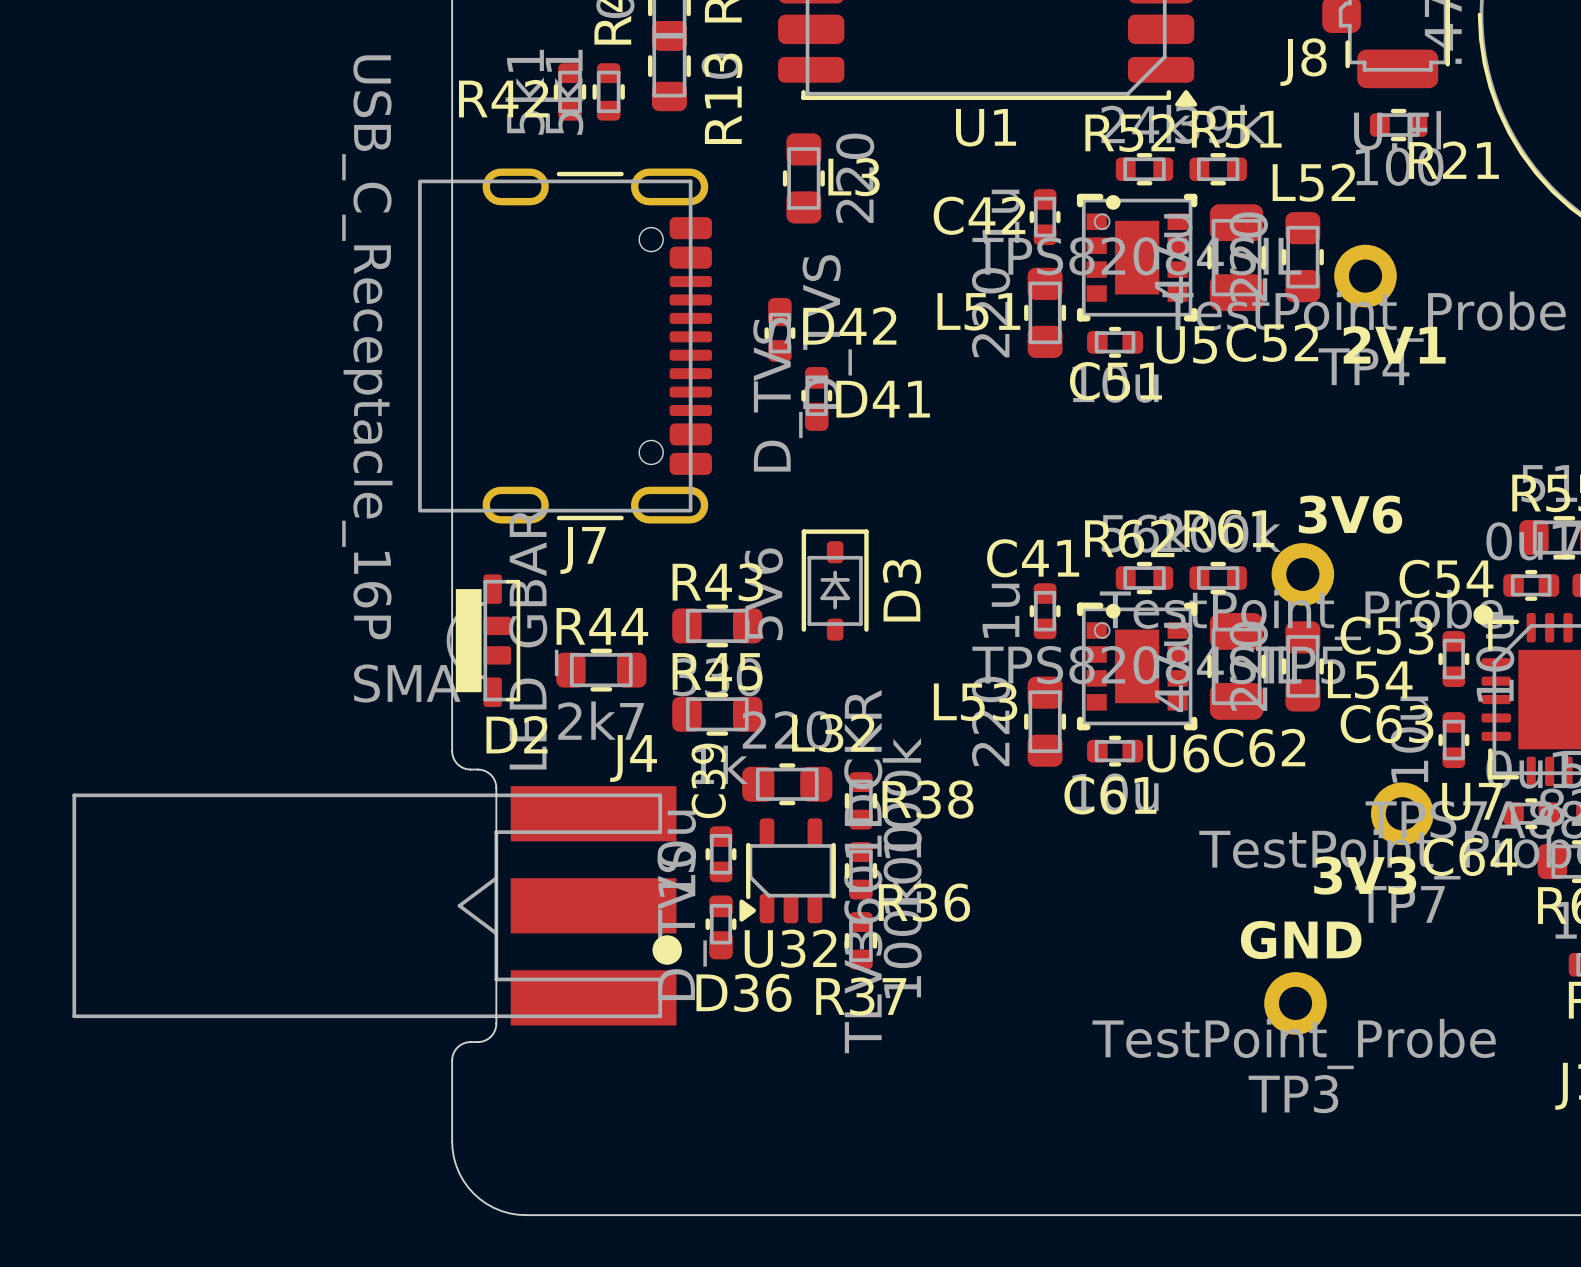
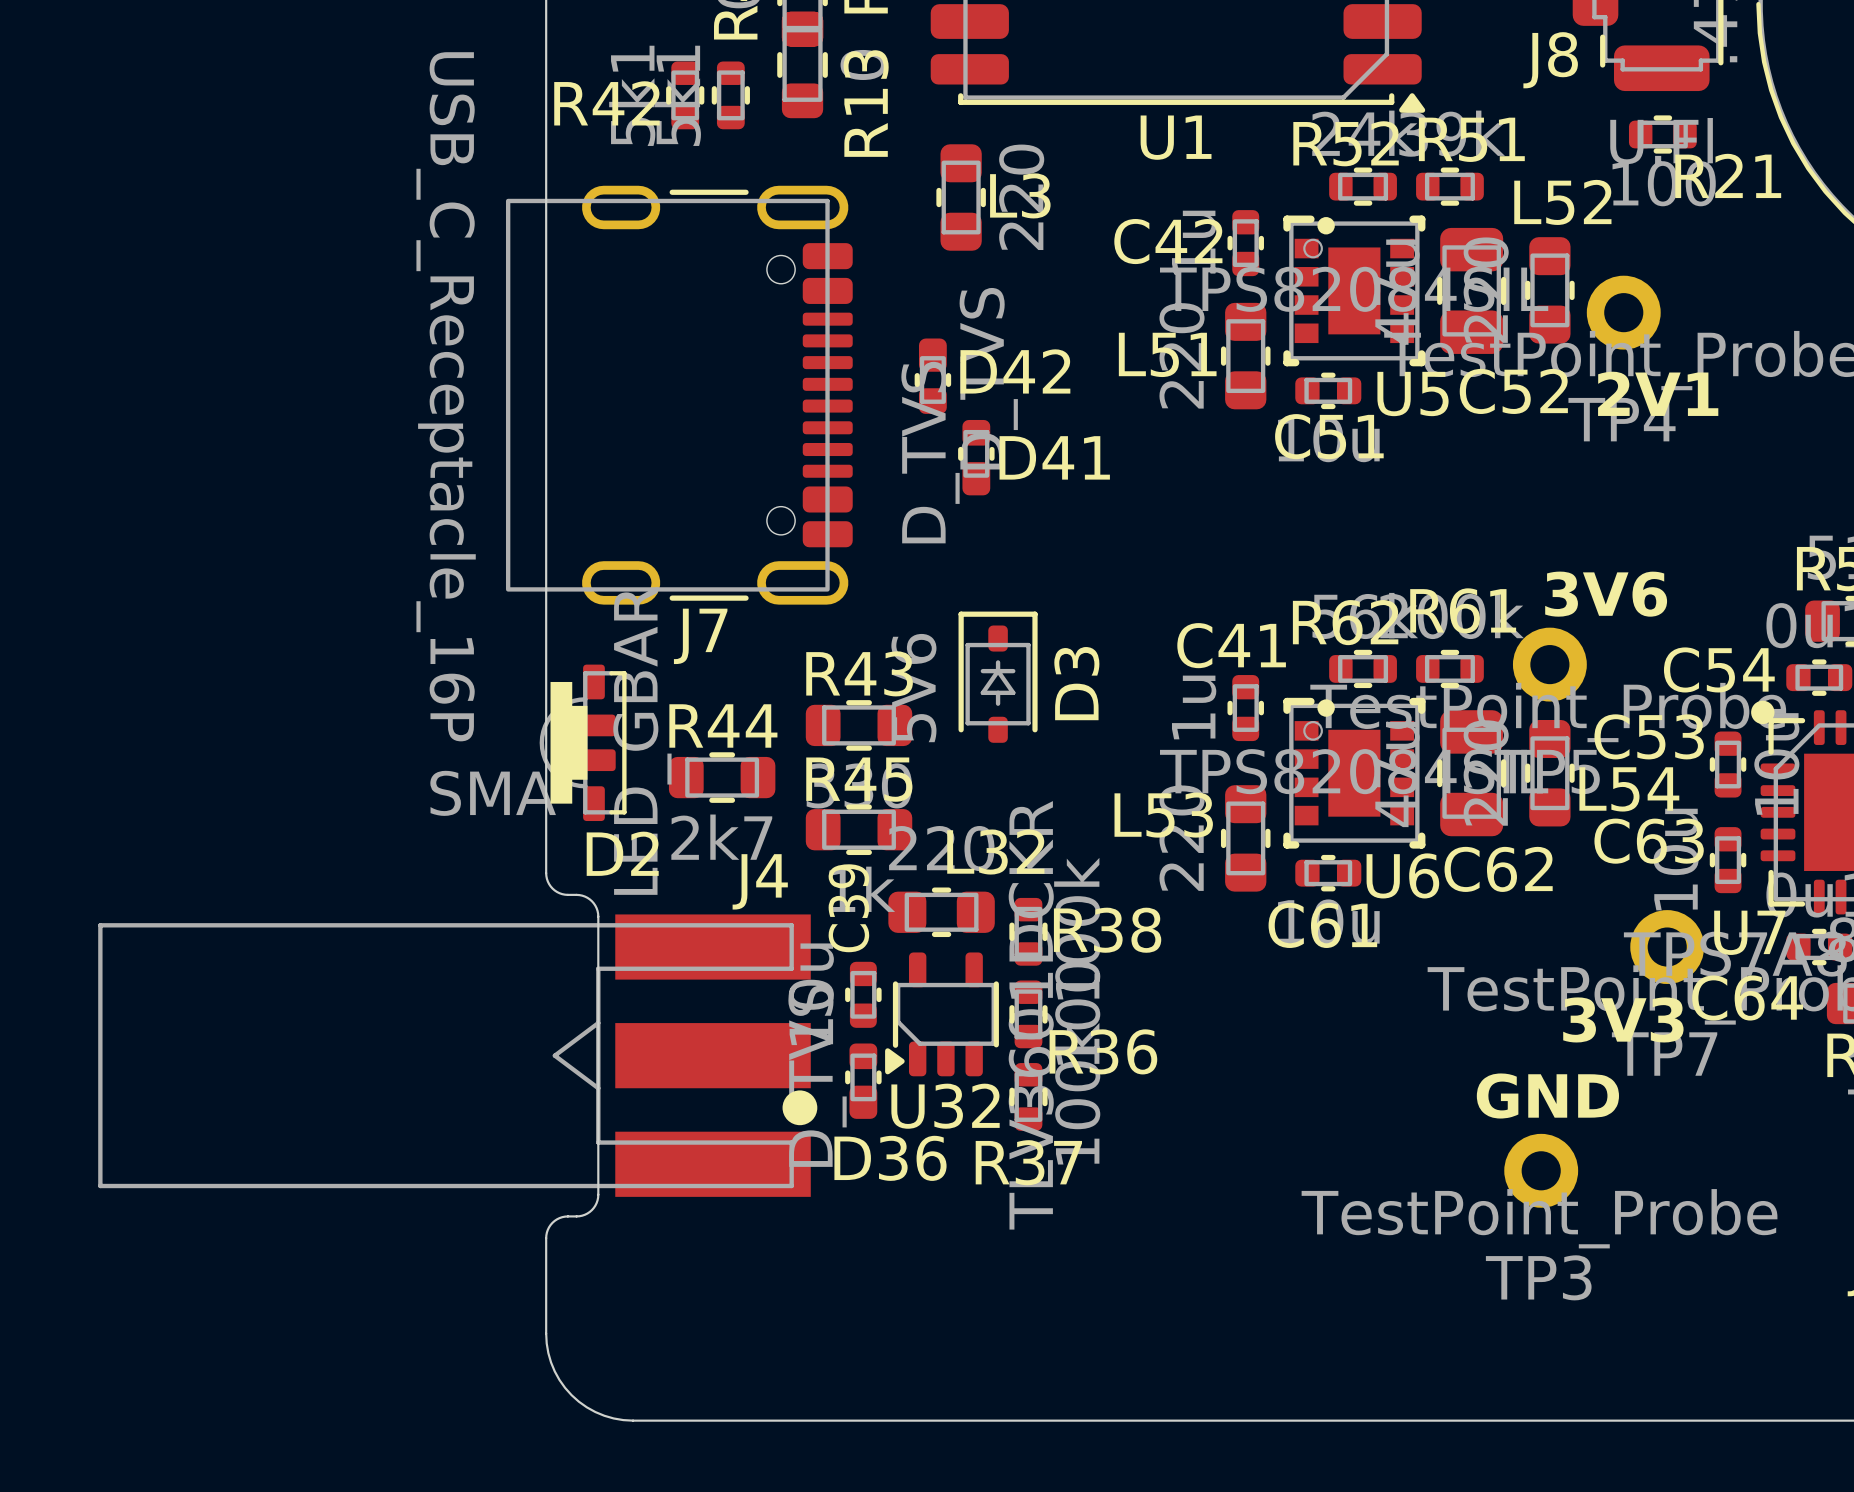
drawing shape: [455, 589, 482, 693] -> [550, 681, 588, 804]

